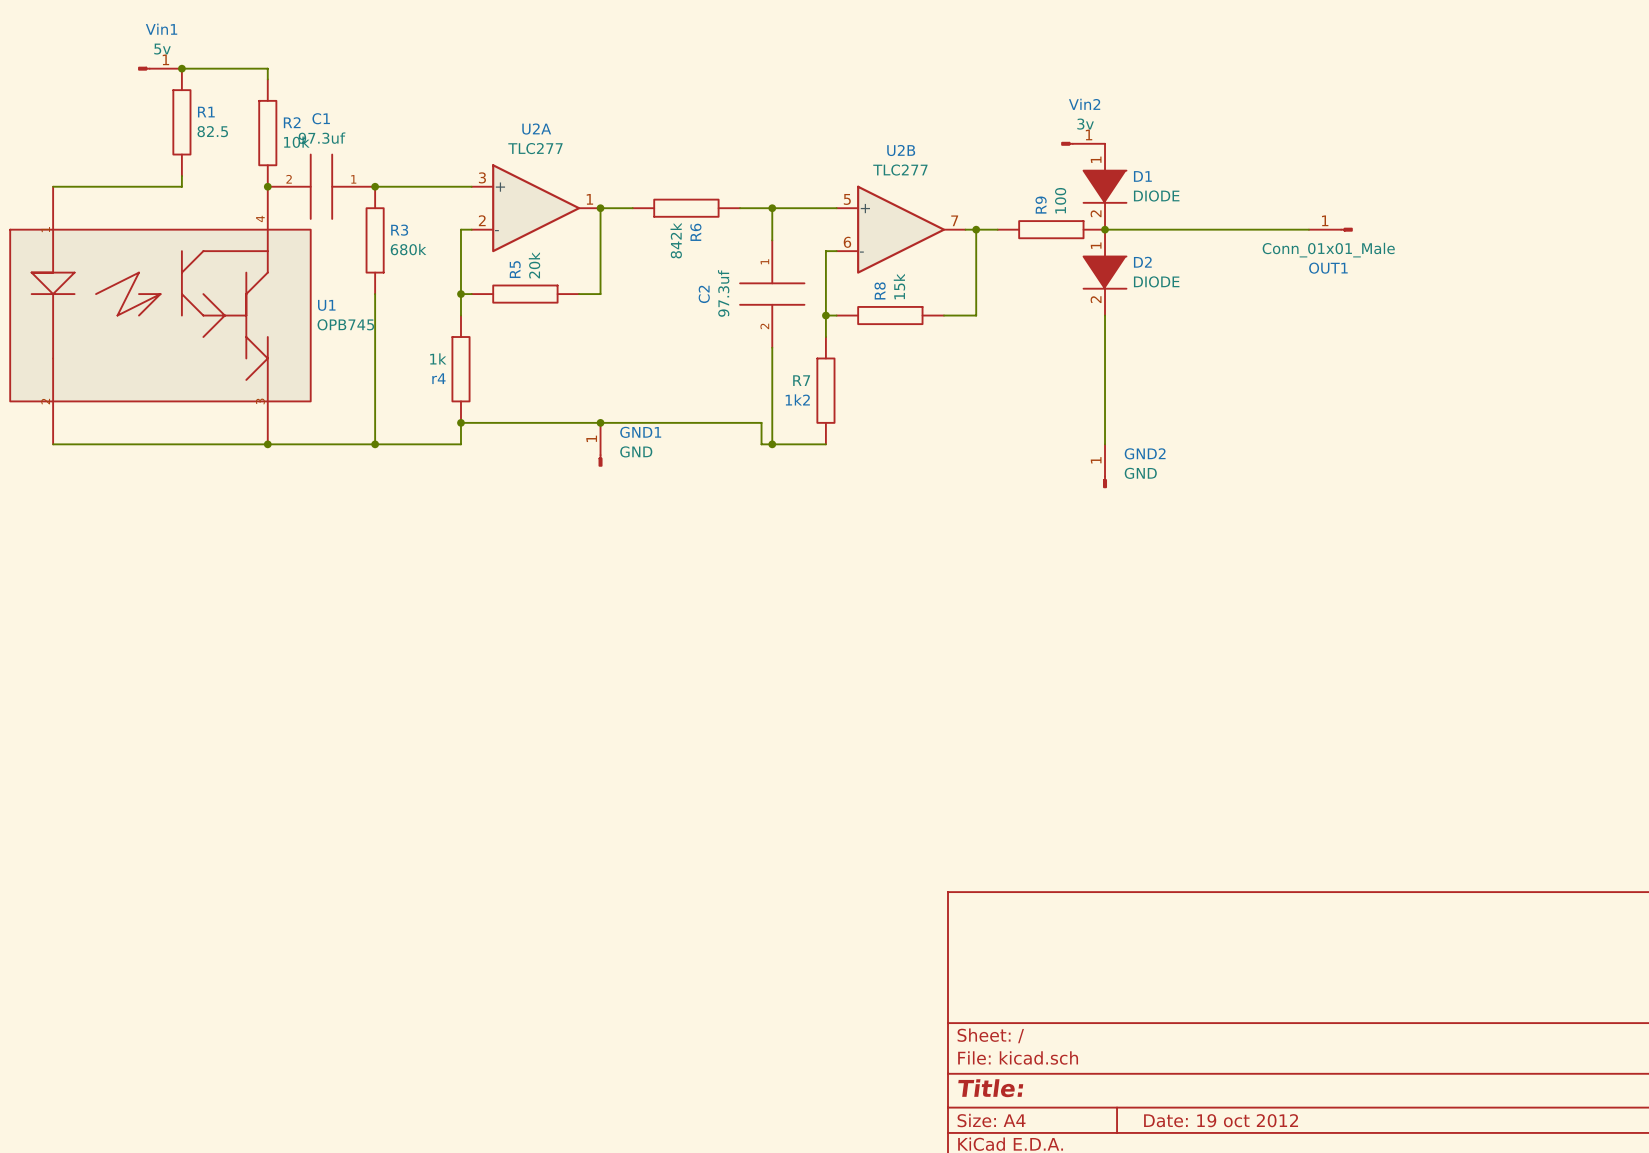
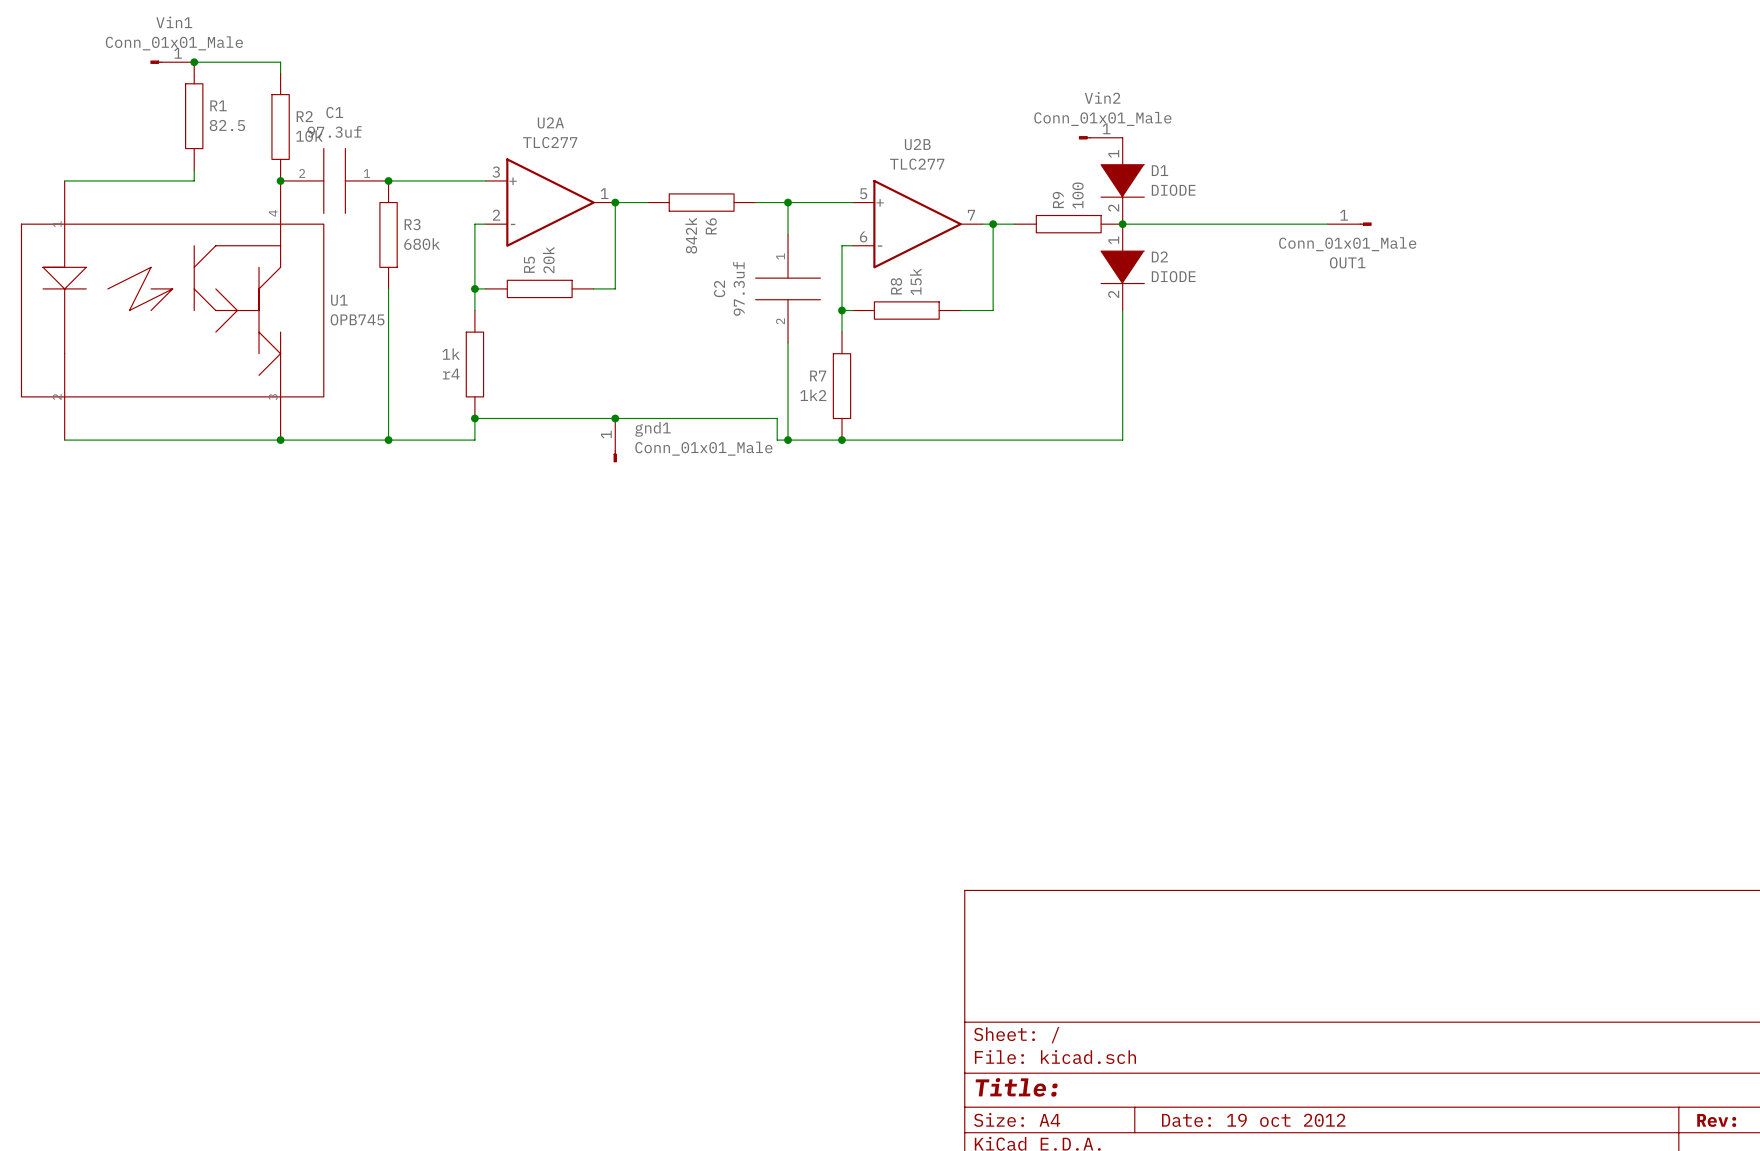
Vin1 value: 5v (162, 49) -> Conn_01x01_Male (174, 43)
Vin2 value: 3v (1085, 124) -> Conn_01x01_Male (1102, 118)
GND1 name: GND1 (640, 432) -> gnd1 (652, 429)
wire: none -> (841, 440) (1122, 440)
junction: none -> (841, 440)
GND1 value: GND (636, 451) -> Conn_01x01_Male (703, 448)
GND2: GND (1105, 466) -> none

